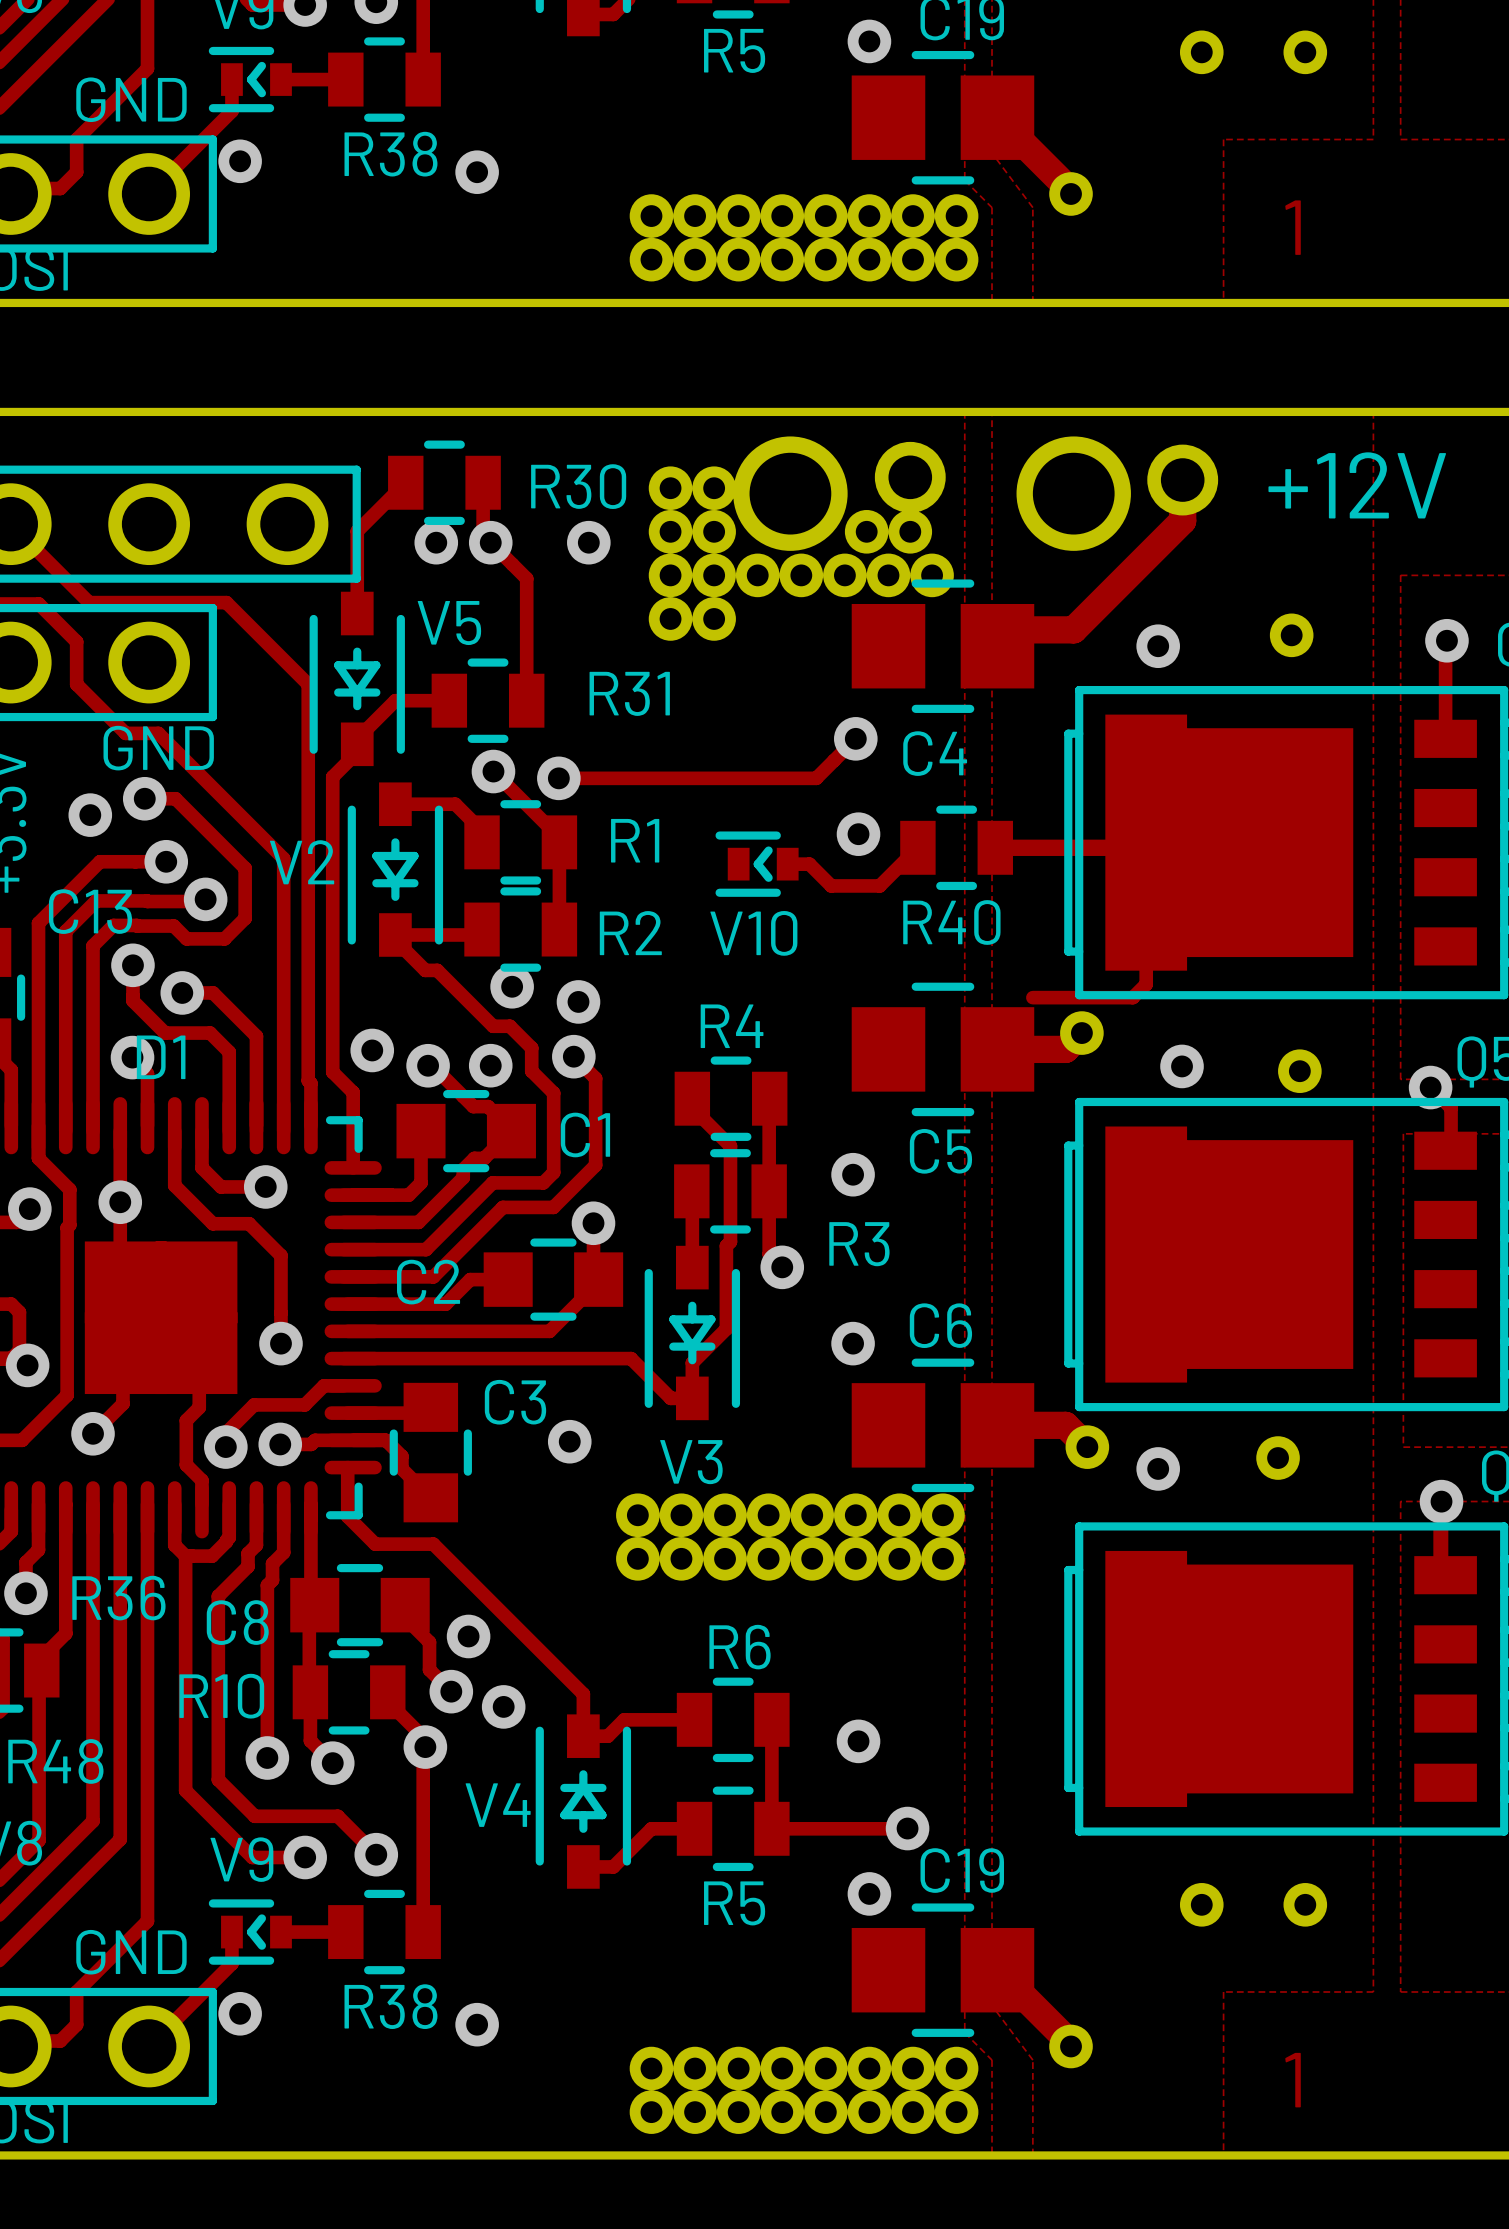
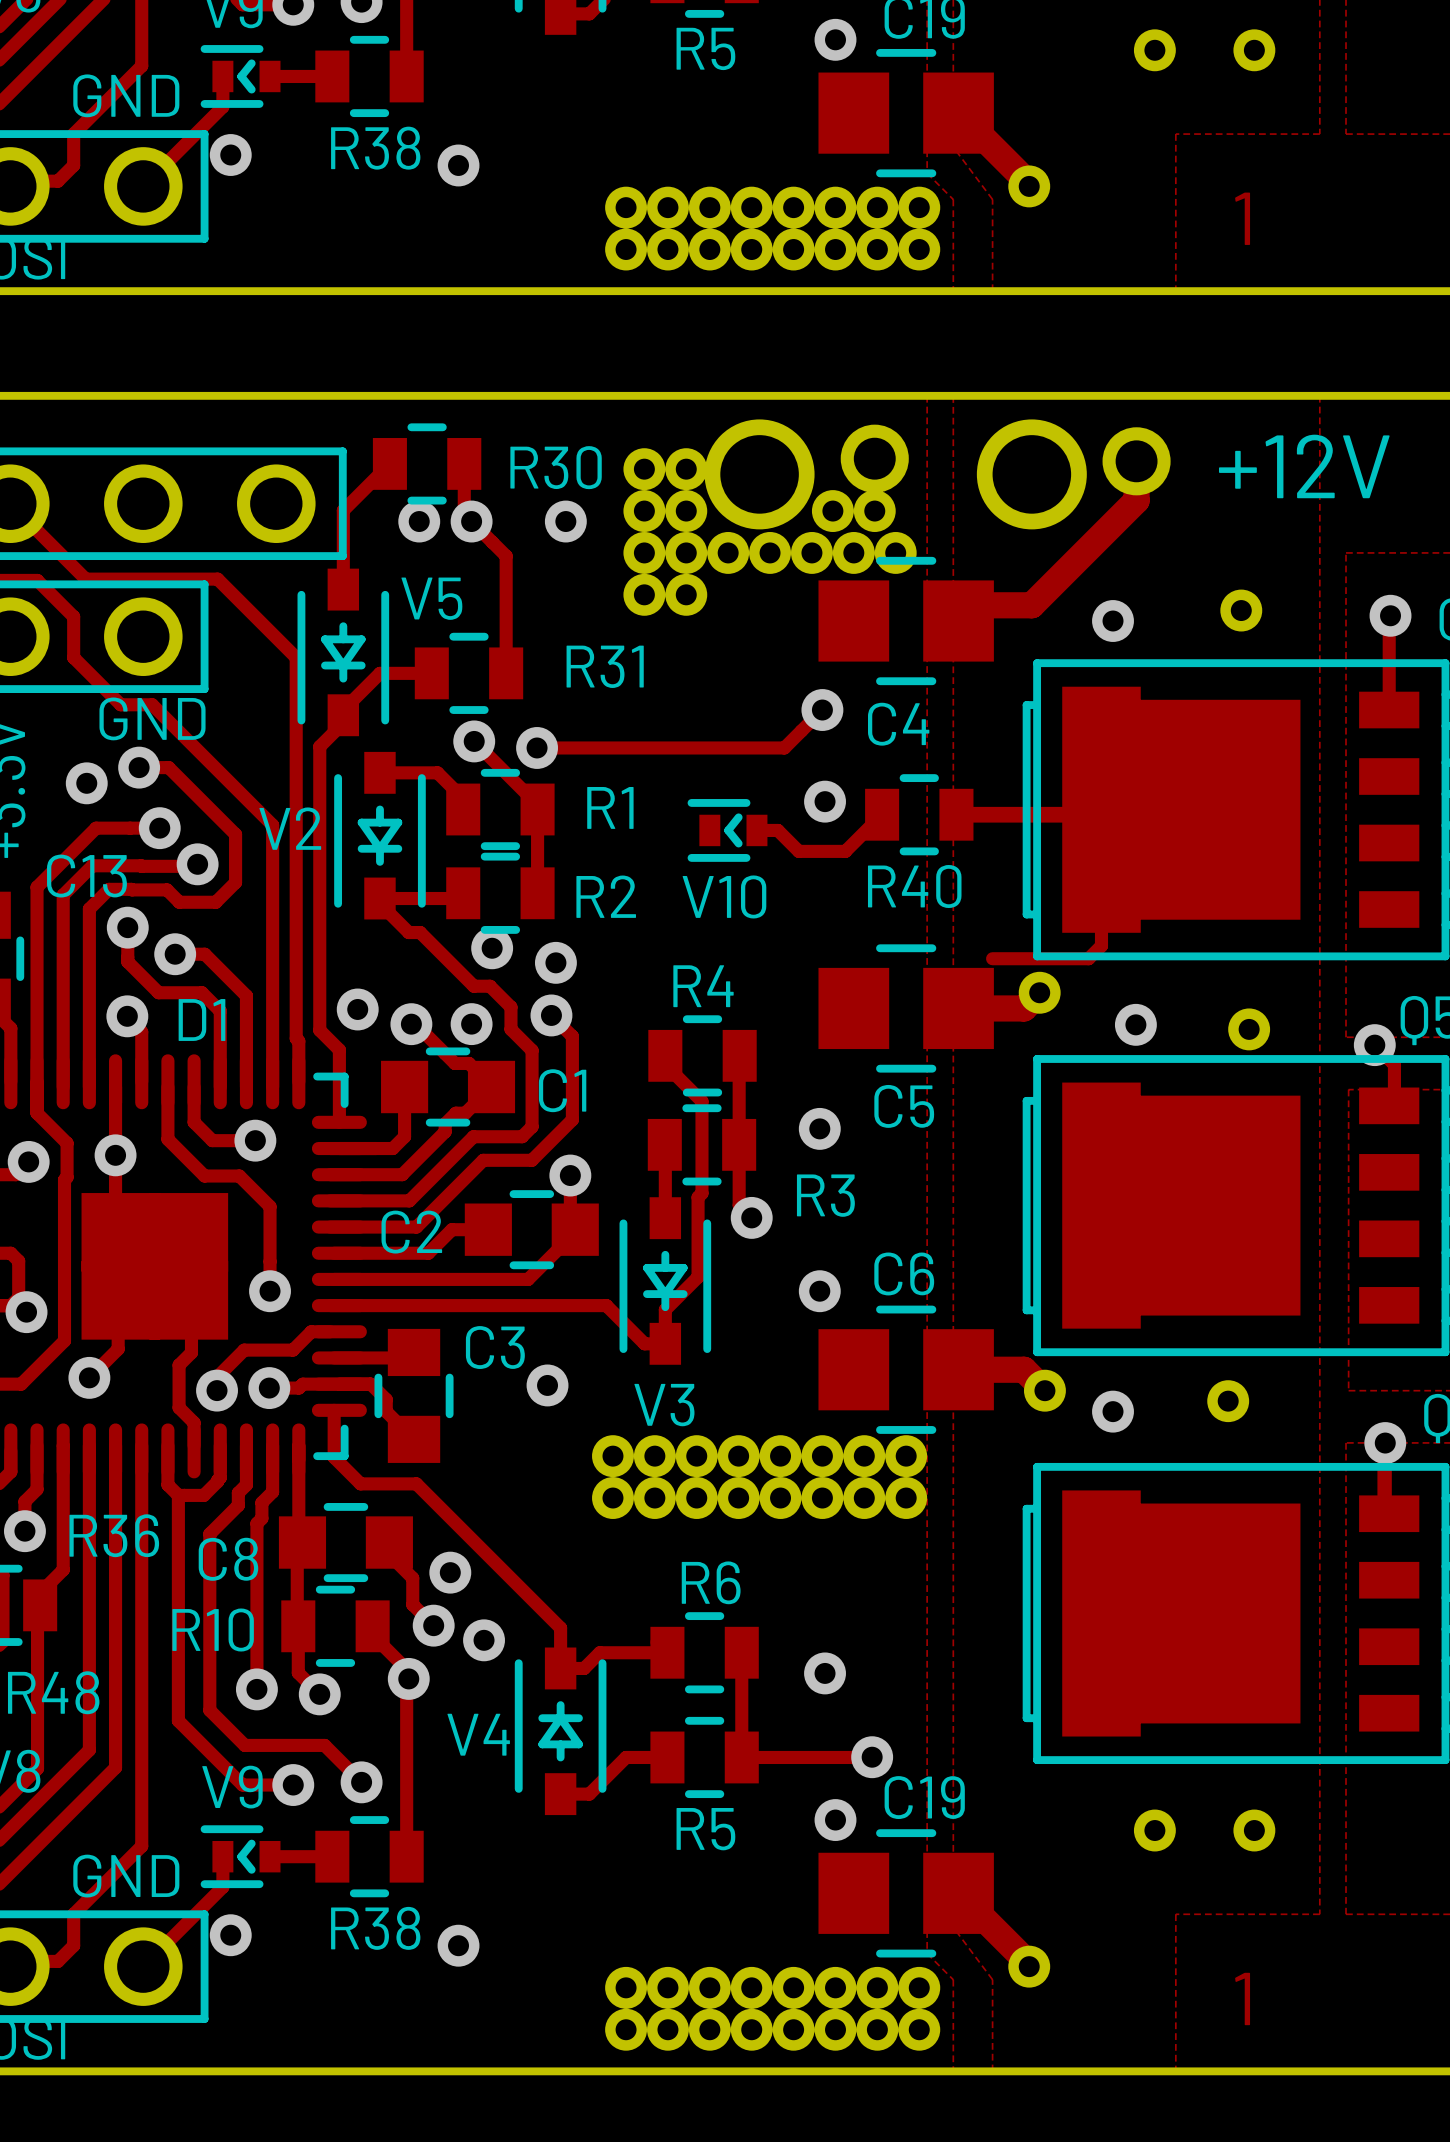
D1 name position: D1 (161, 1057) -> D1 (201, 1019)

